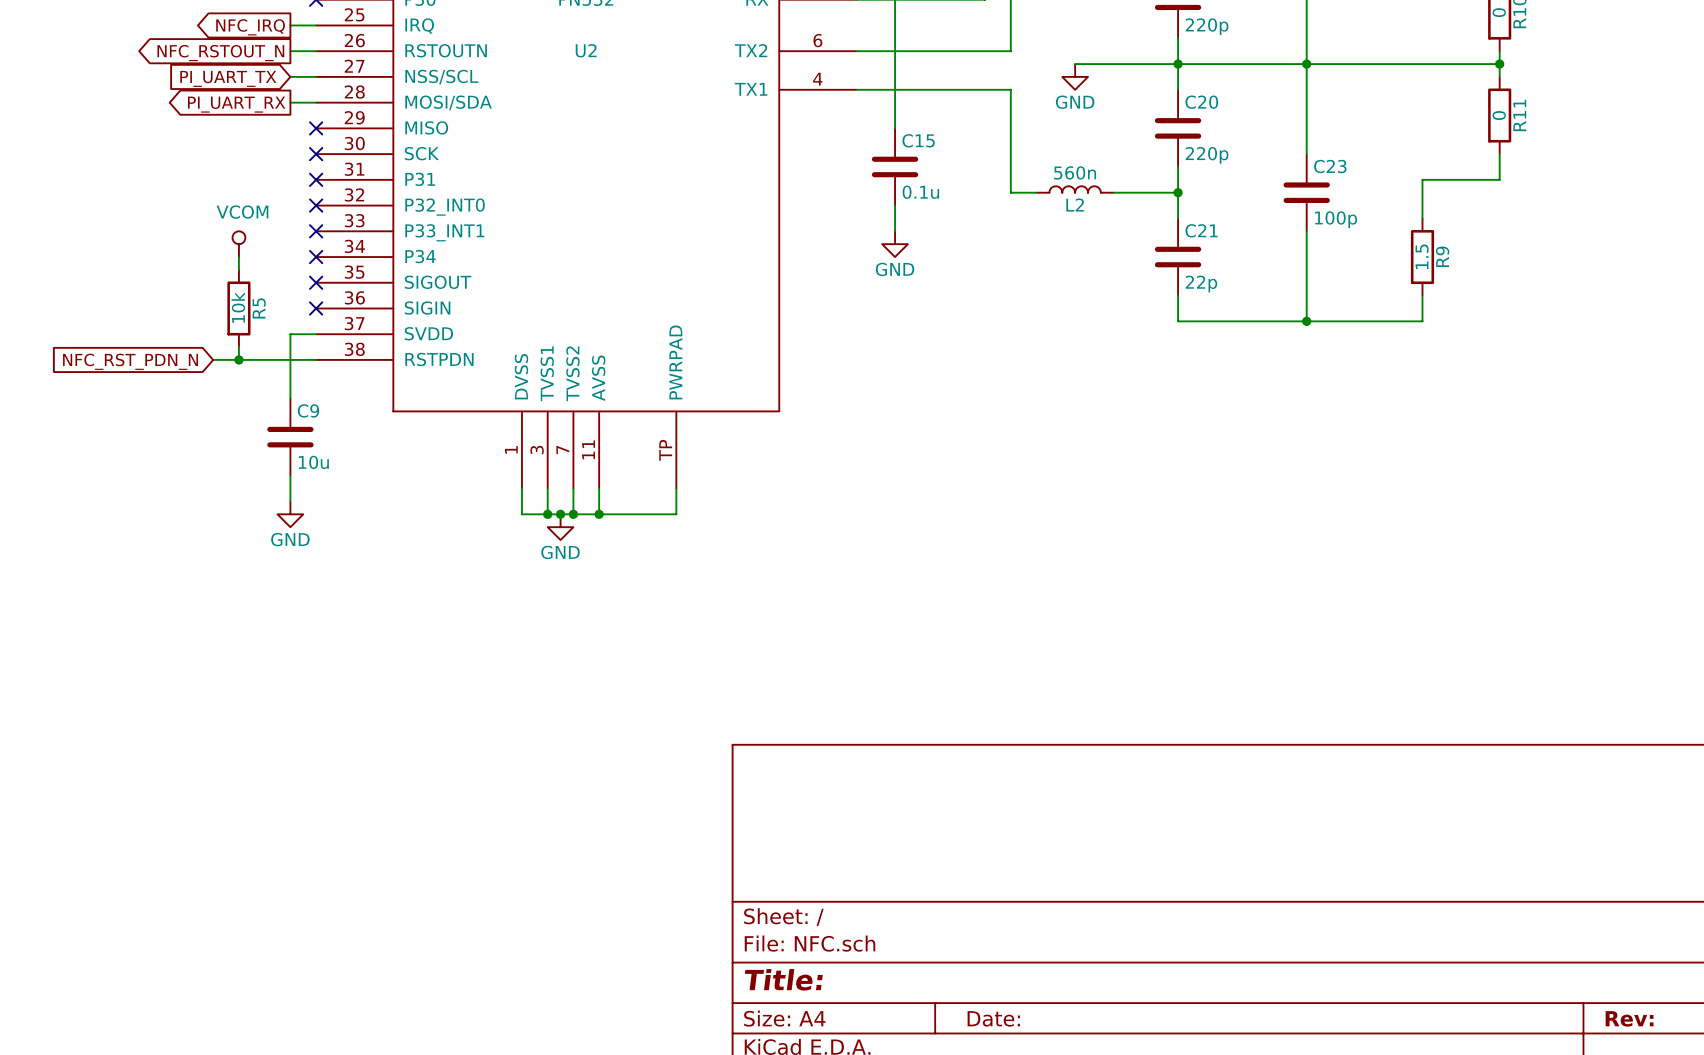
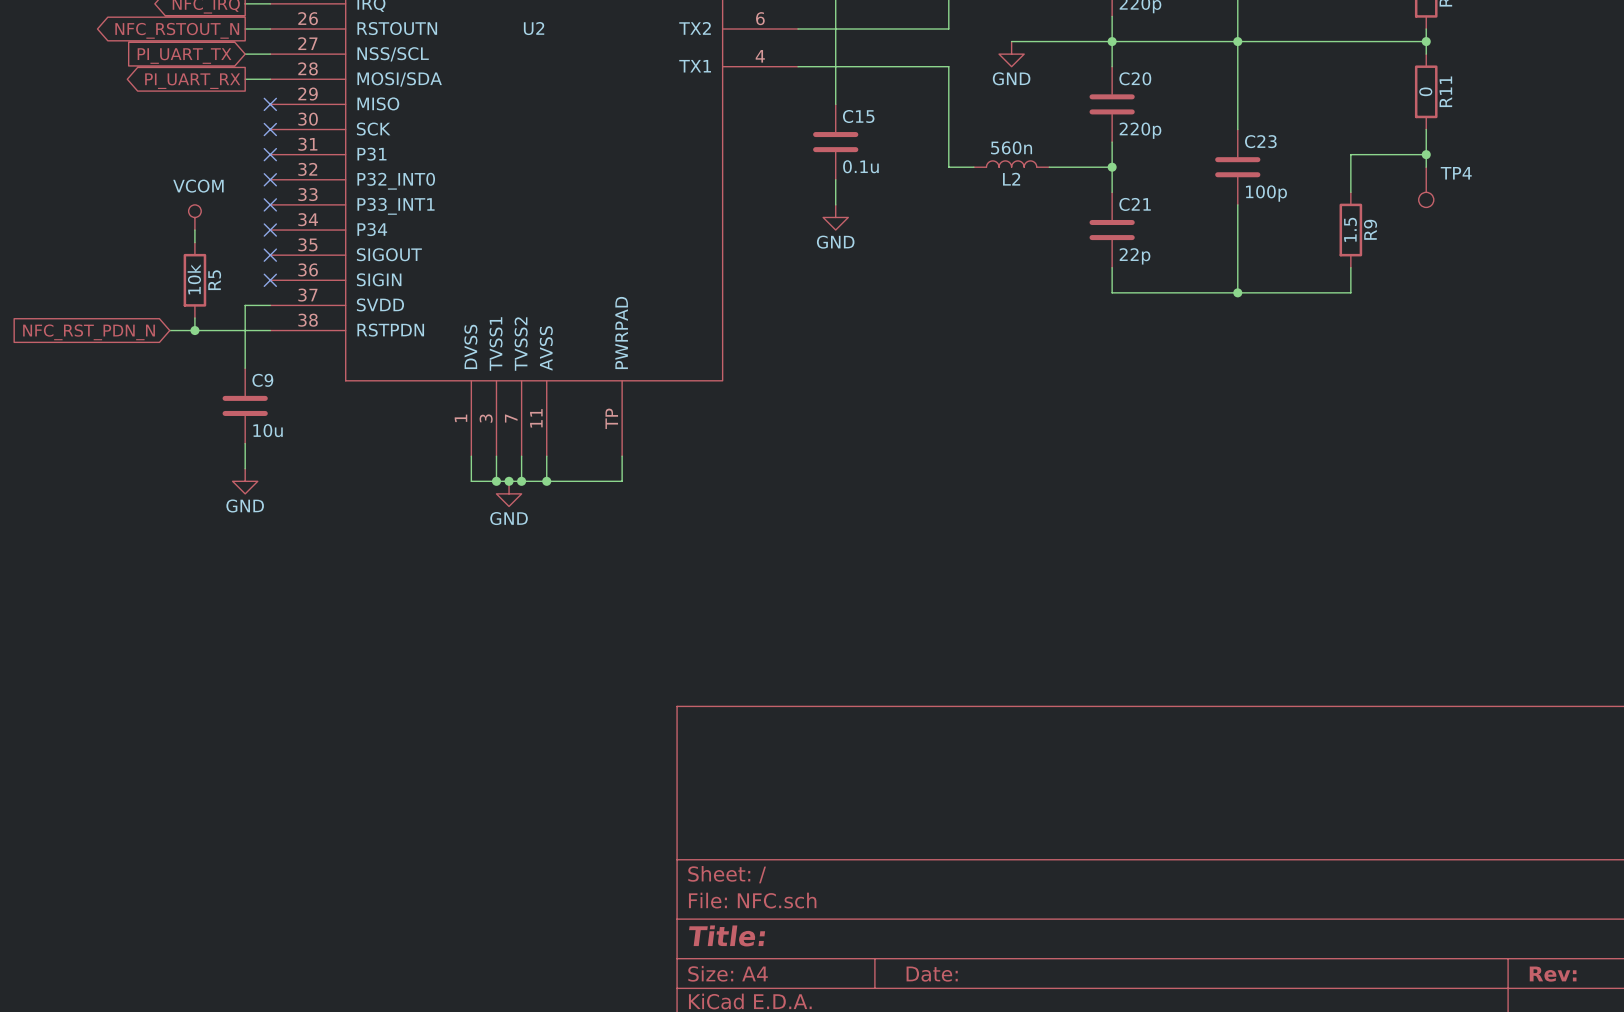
wire: none -> (1426, 154) (1426, 167)
junction: none -> (1426, 154)
TP4: none -> (1426, 187)

